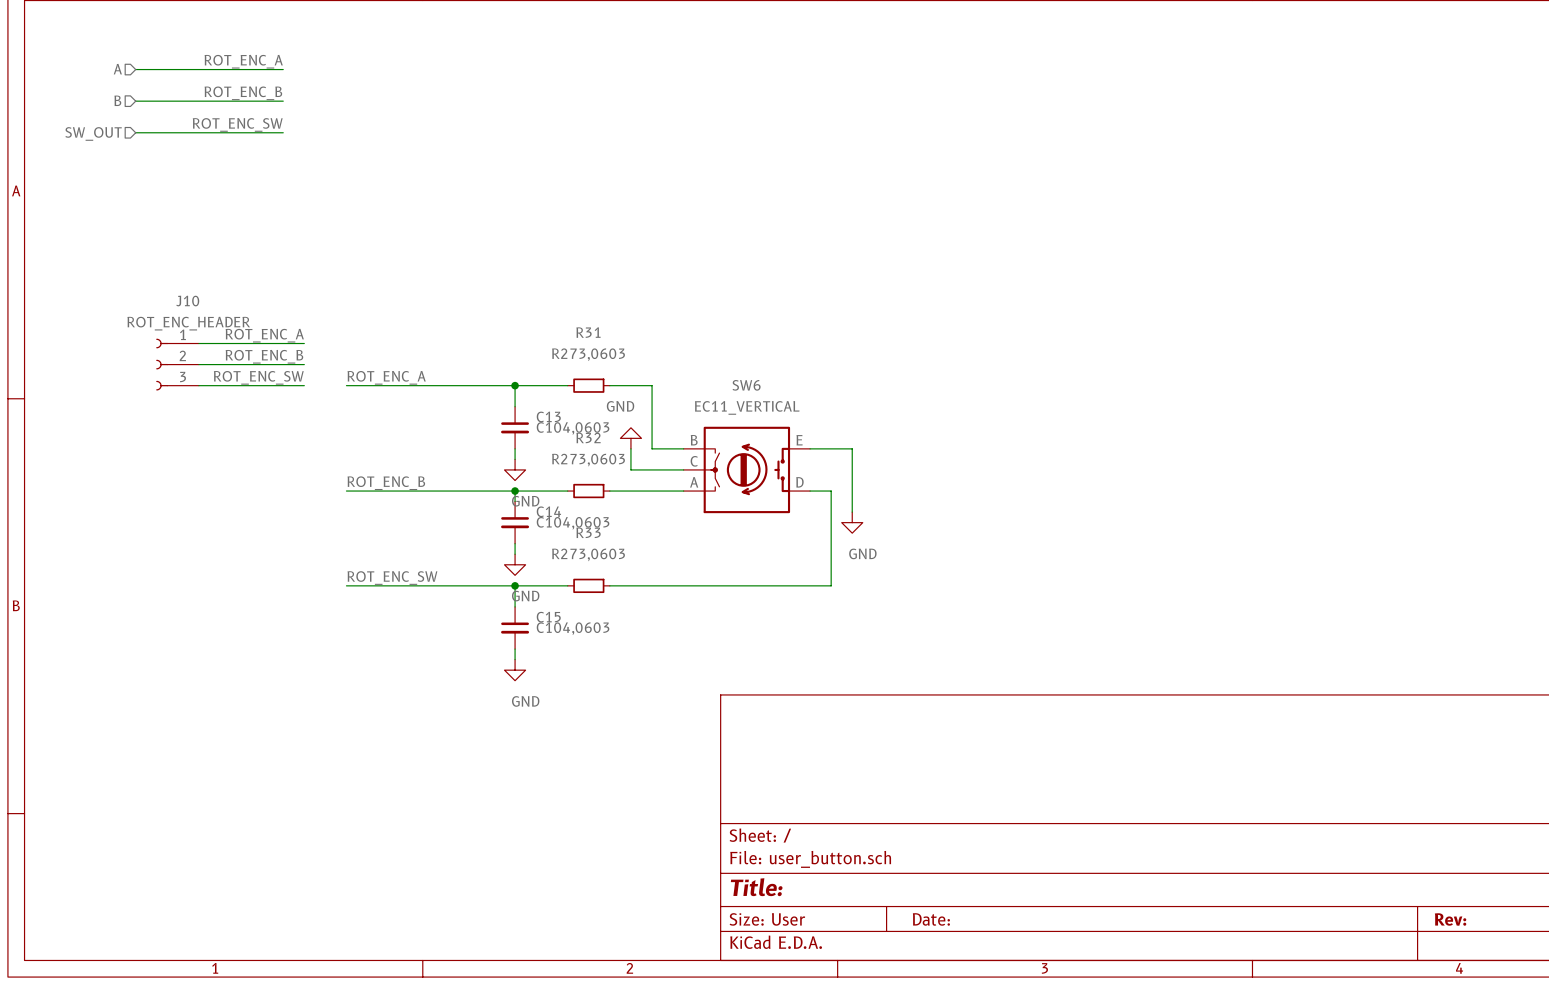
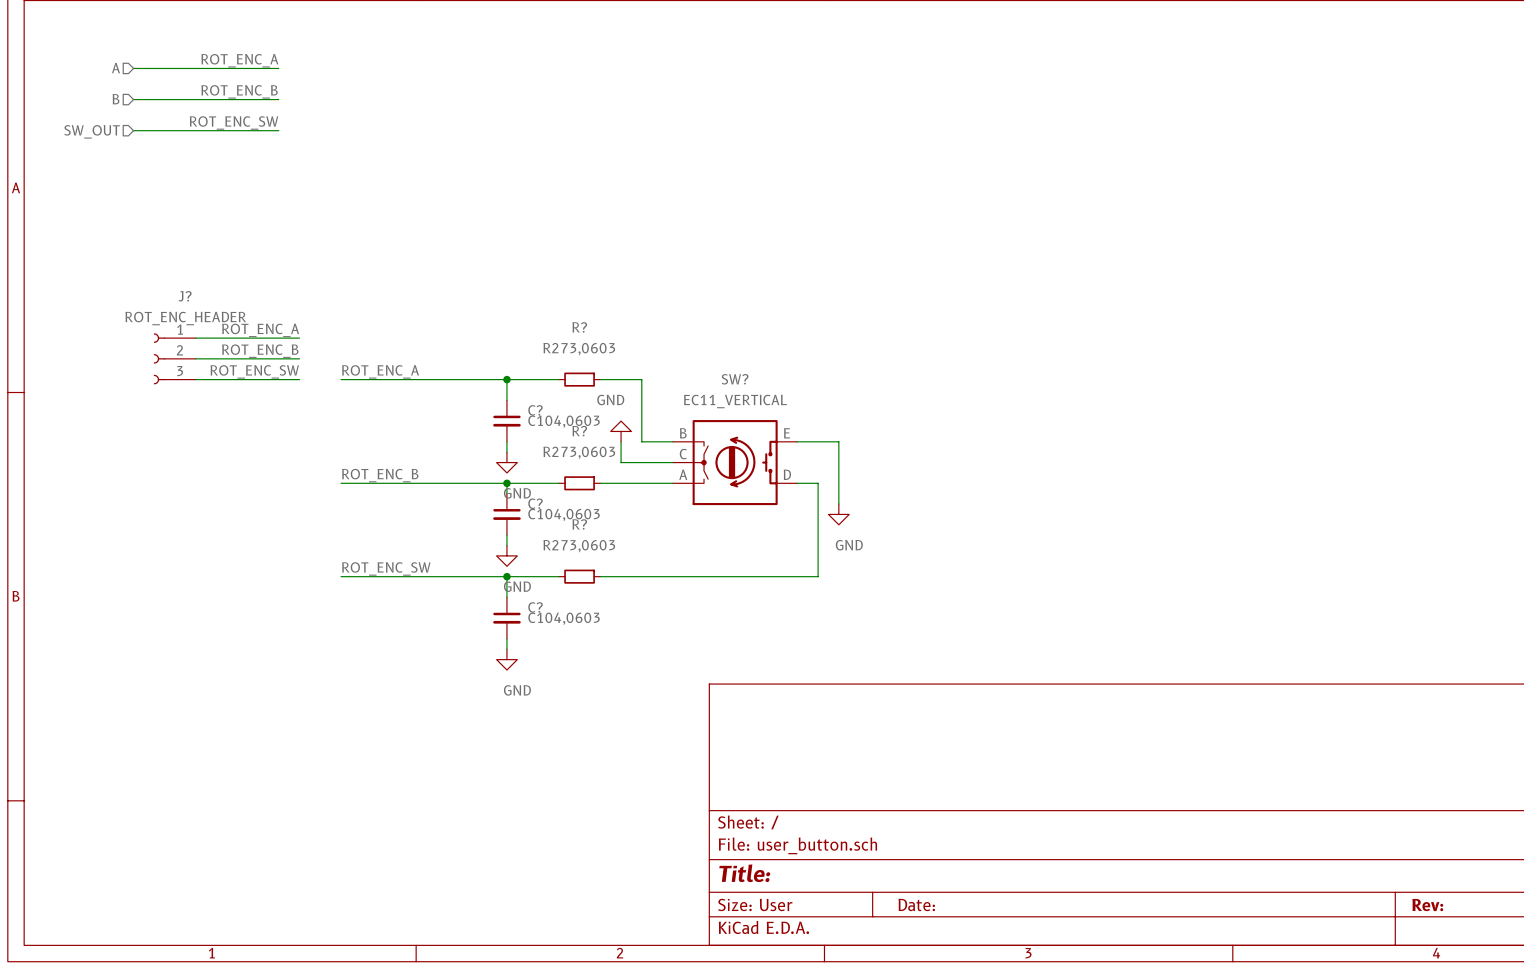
J10 name: J10 (187, 301) -> J? (185, 296)
R31 name: R31 (588, 332) -> R? (579, 327)
SW6 name: SW6 (746, 385) -> SW? (735, 379)
C13 name: C13 (548, 416) -> C? (535, 410)
R32 name: R32 (588, 437) -> R? (579, 431)
C14 name: C14 (548, 511) -> C? (535, 503)
R33 name: R33 (588, 532) -> R? (579, 524)
C15 name: C15 (548, 617) -> C? (535, 607)

